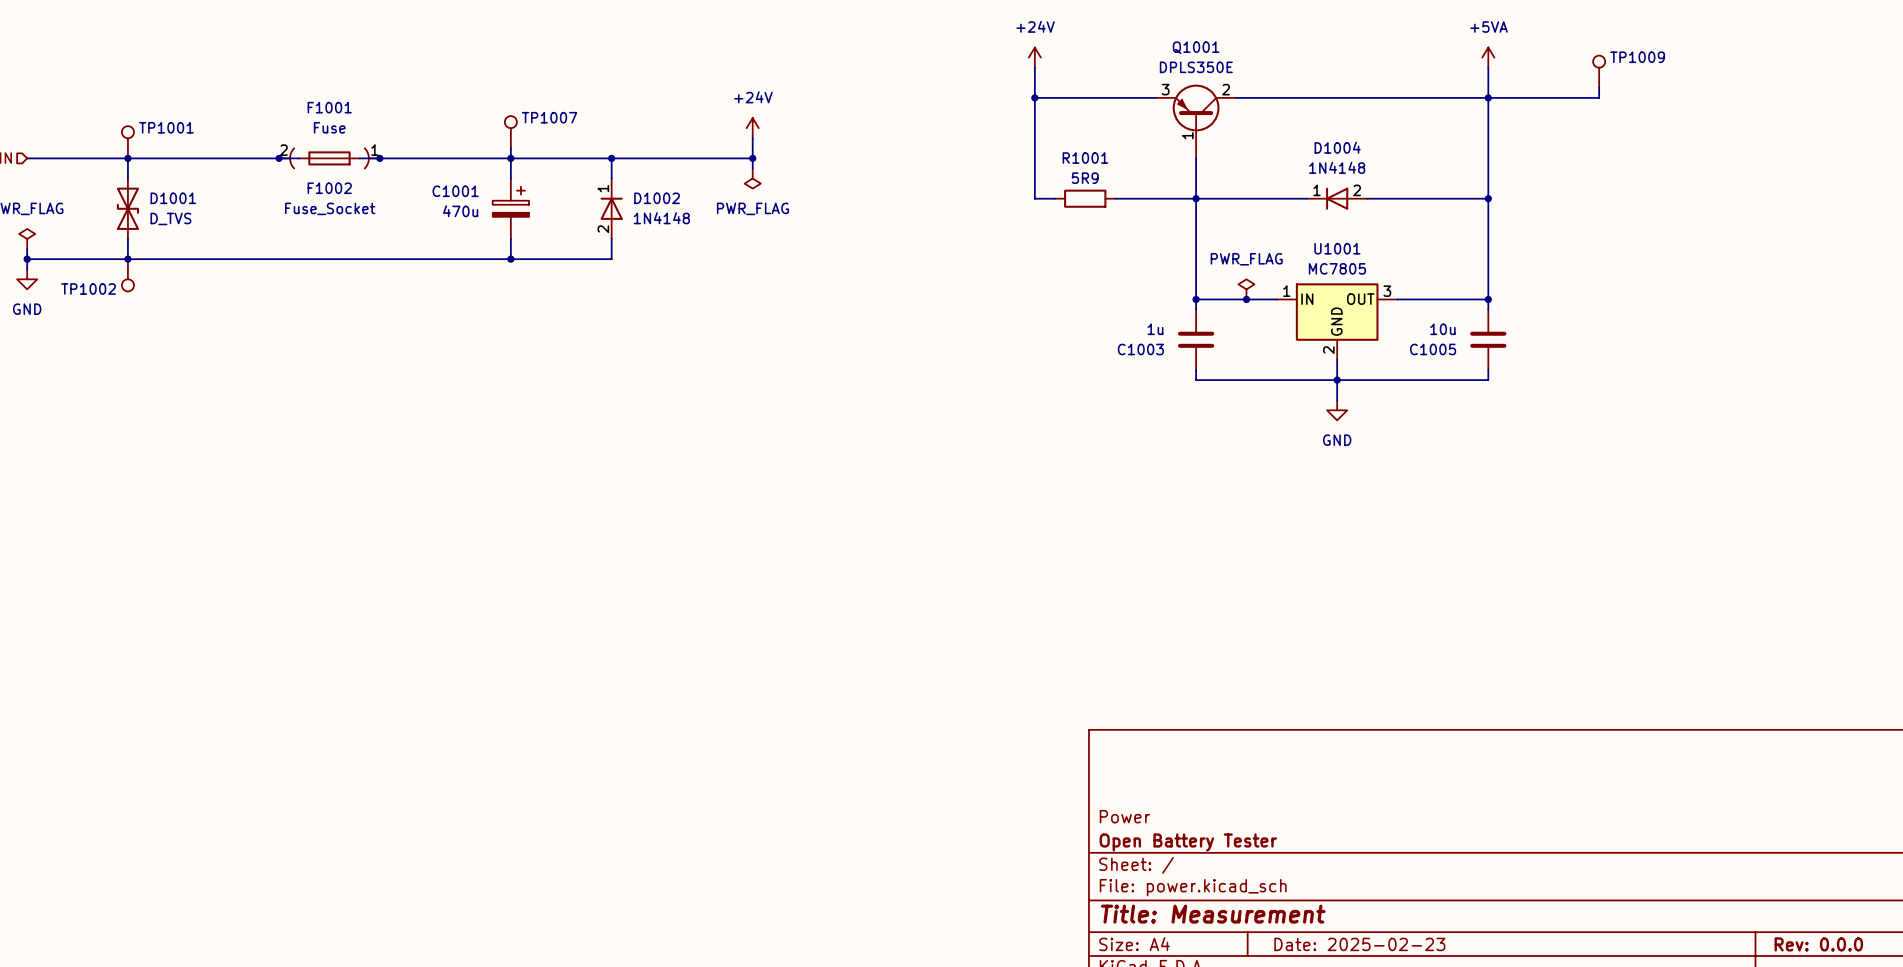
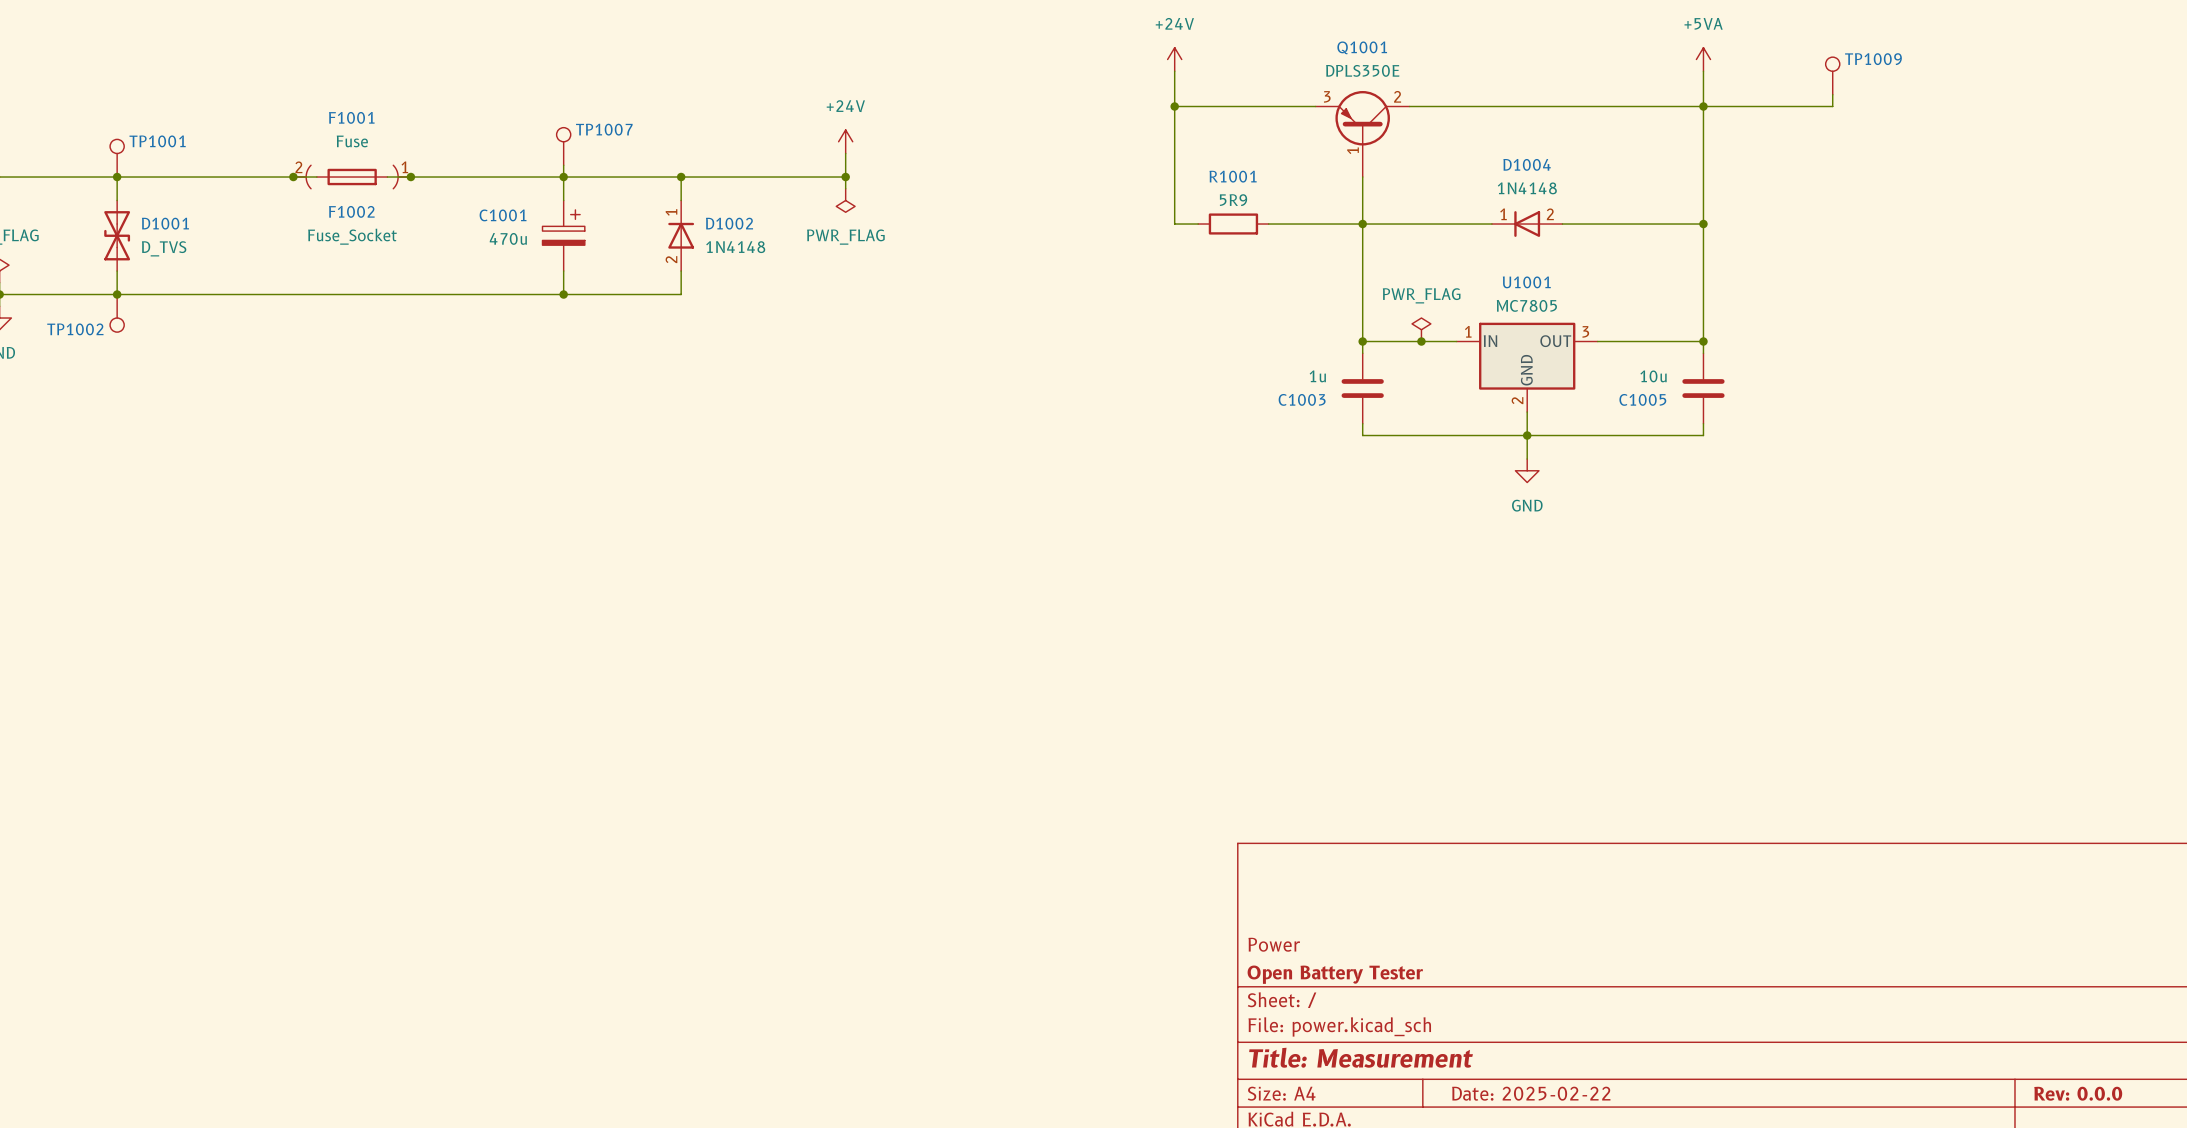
title block: Date: 2025-02-23 (1359, 944) -> Date: 2025-02-22 (1531, 1093)

